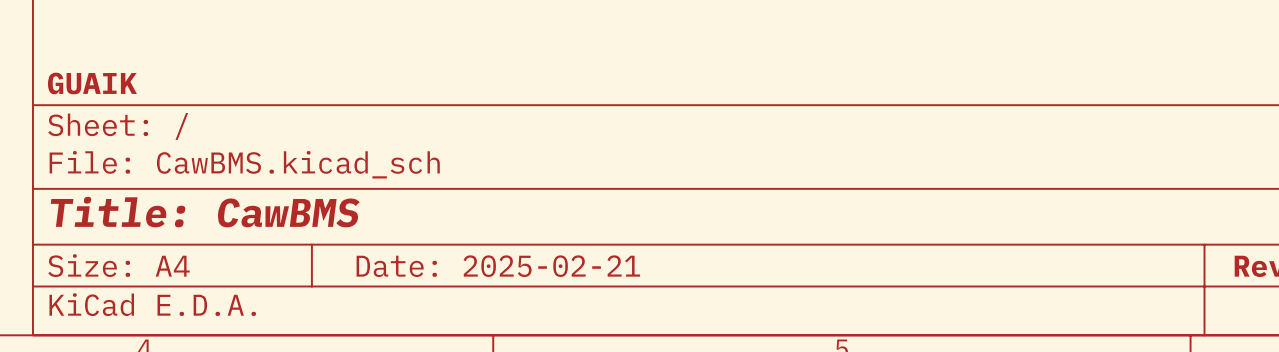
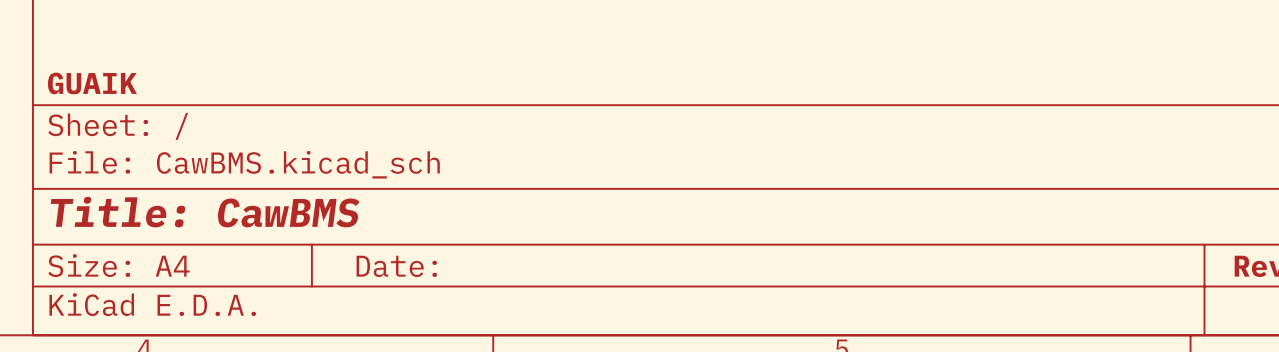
title block: Date: 2025-02-21 (498, 266) -> Date: (396, 266)

